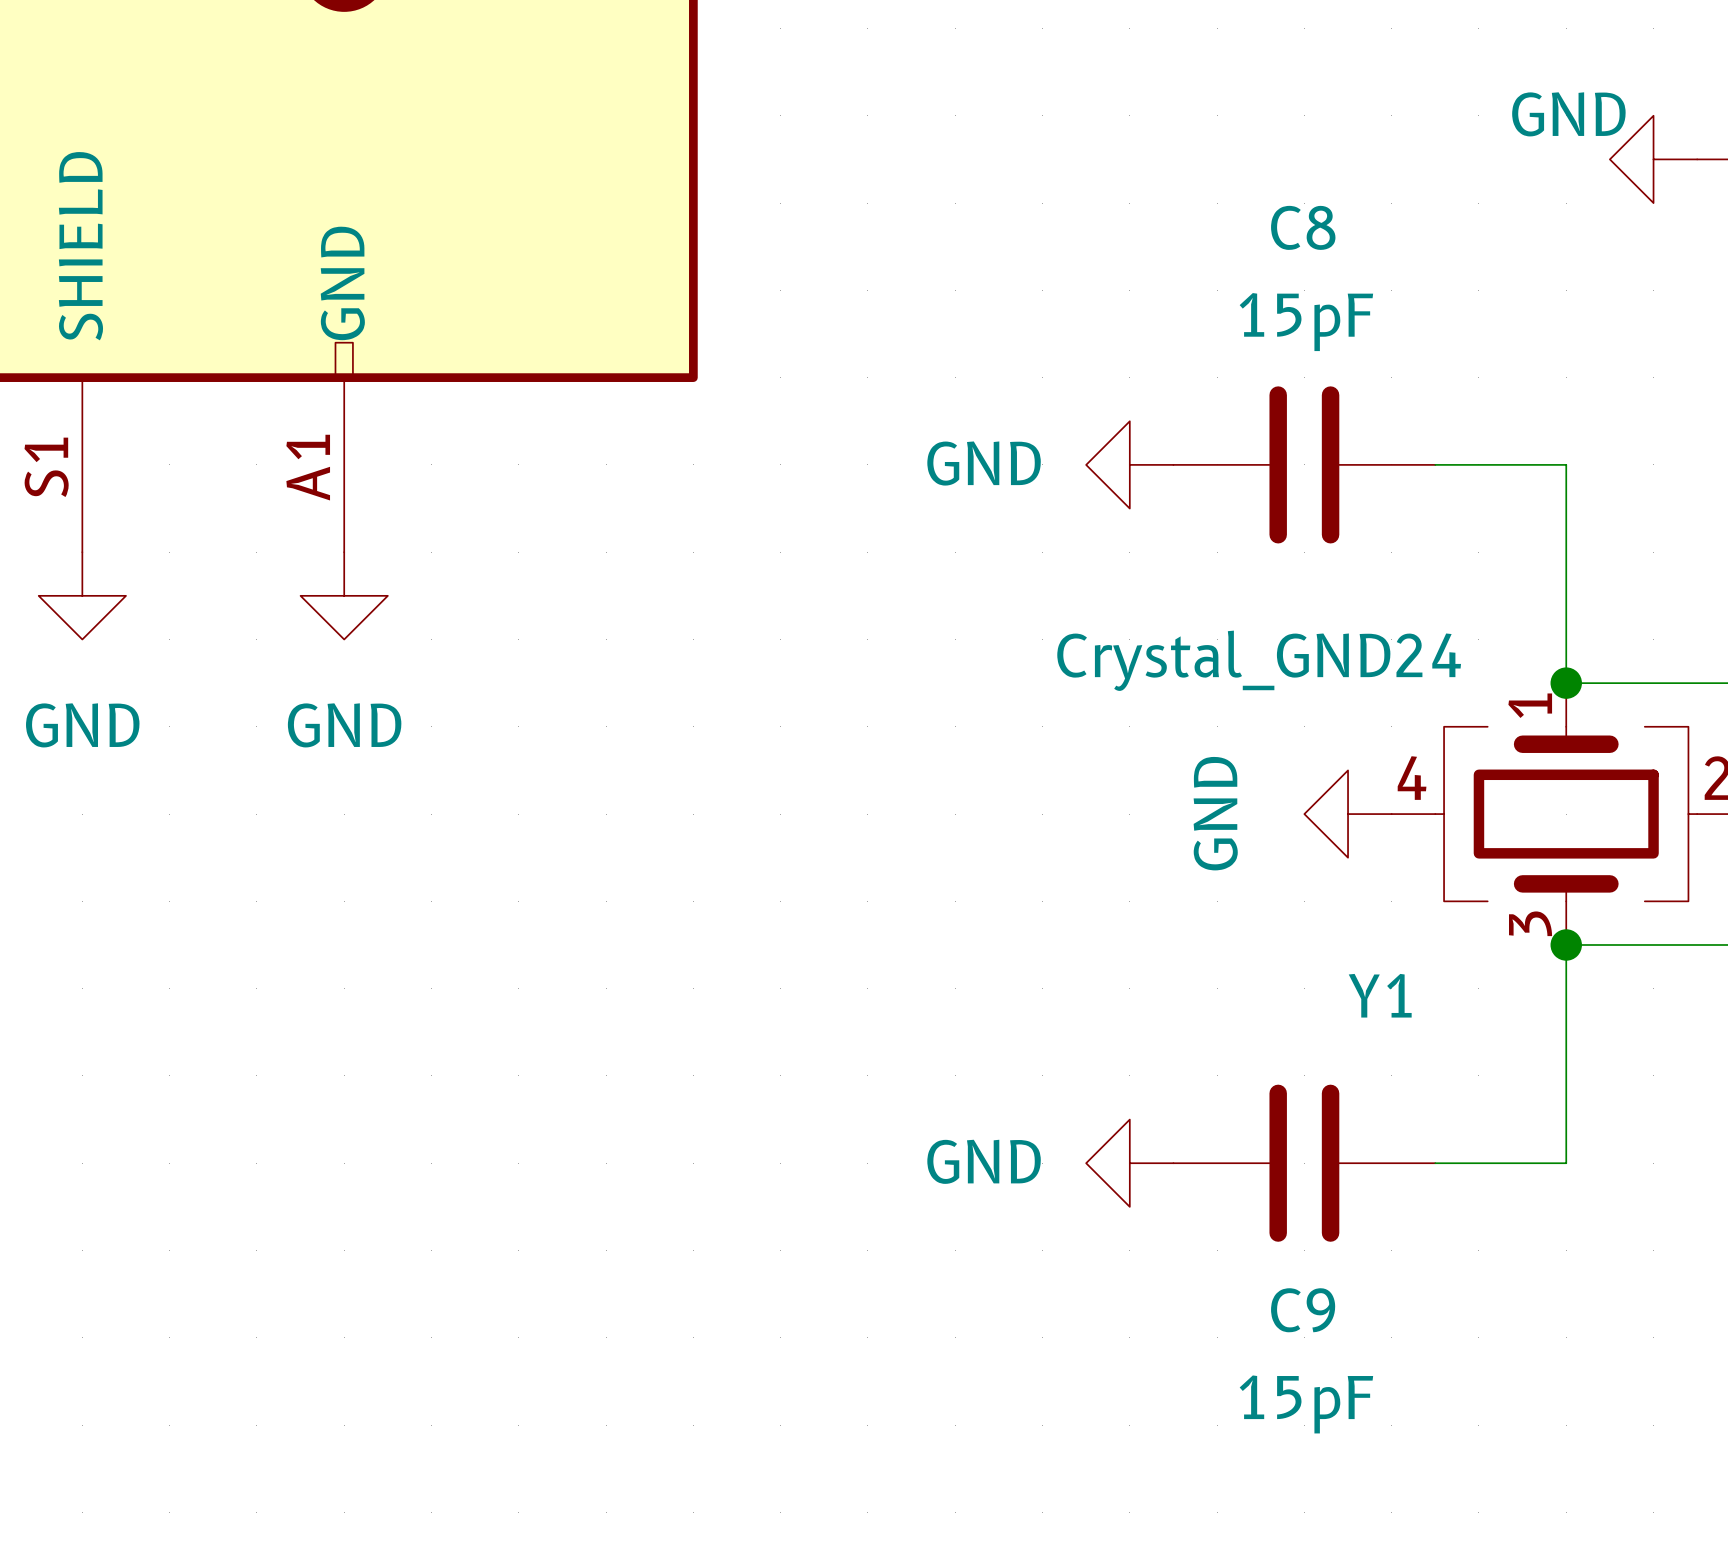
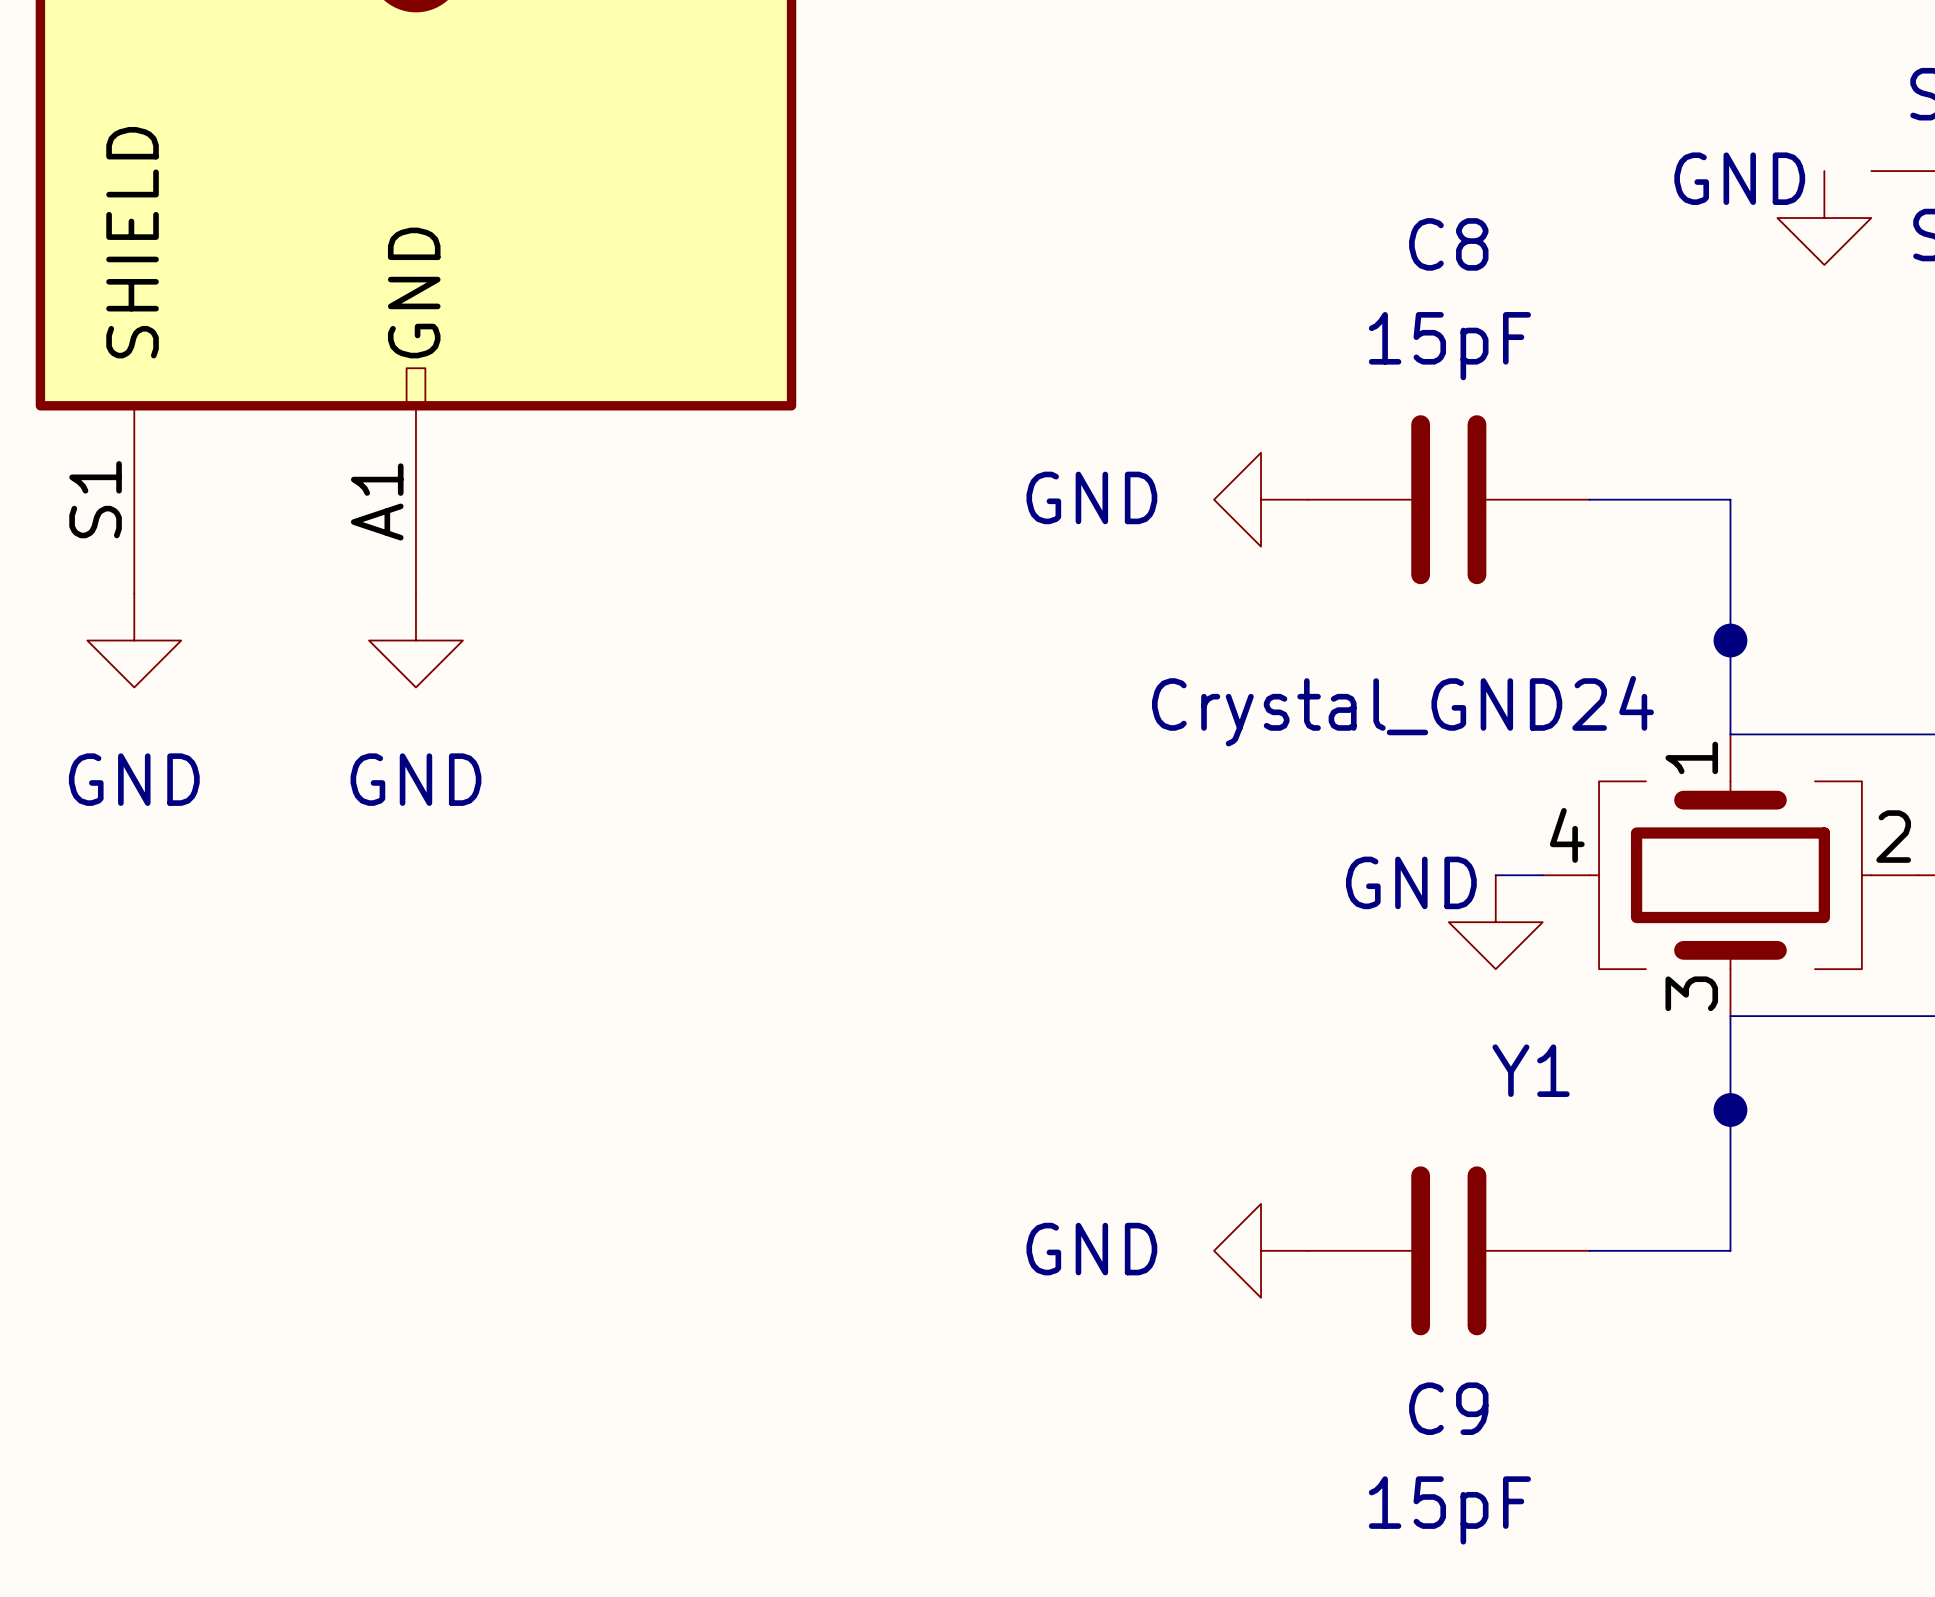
power symbol rotation: 0° (1653, 159) -> 90° counterclockwise (1824, 218)
junction position: (1566, 683) -> (1730, 640)
power symbol text position: GND (1215, 813) -> GND (1411, 882)
power symbol rotation: 0° (1348, 814) -> 90° counterclockwise (1495, 922)
junction position: (1566, 944) -> (1730, 1109)

